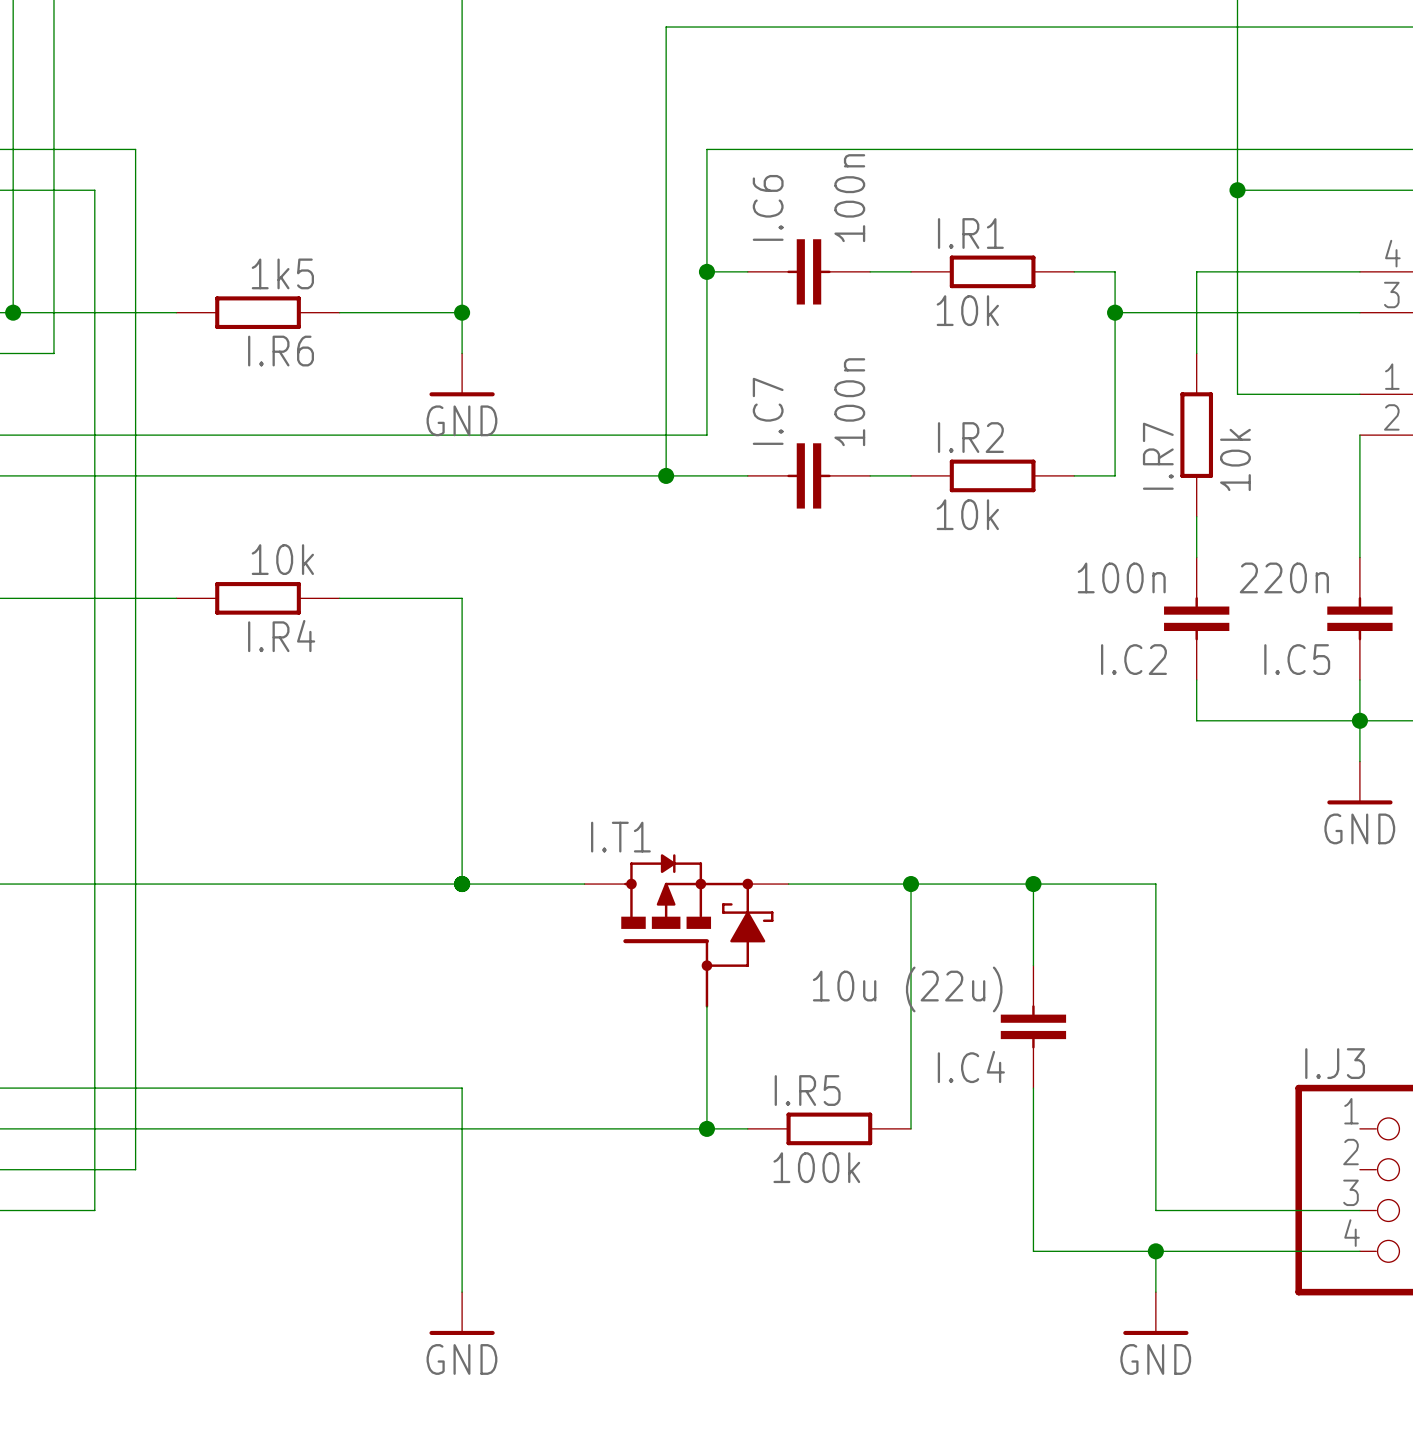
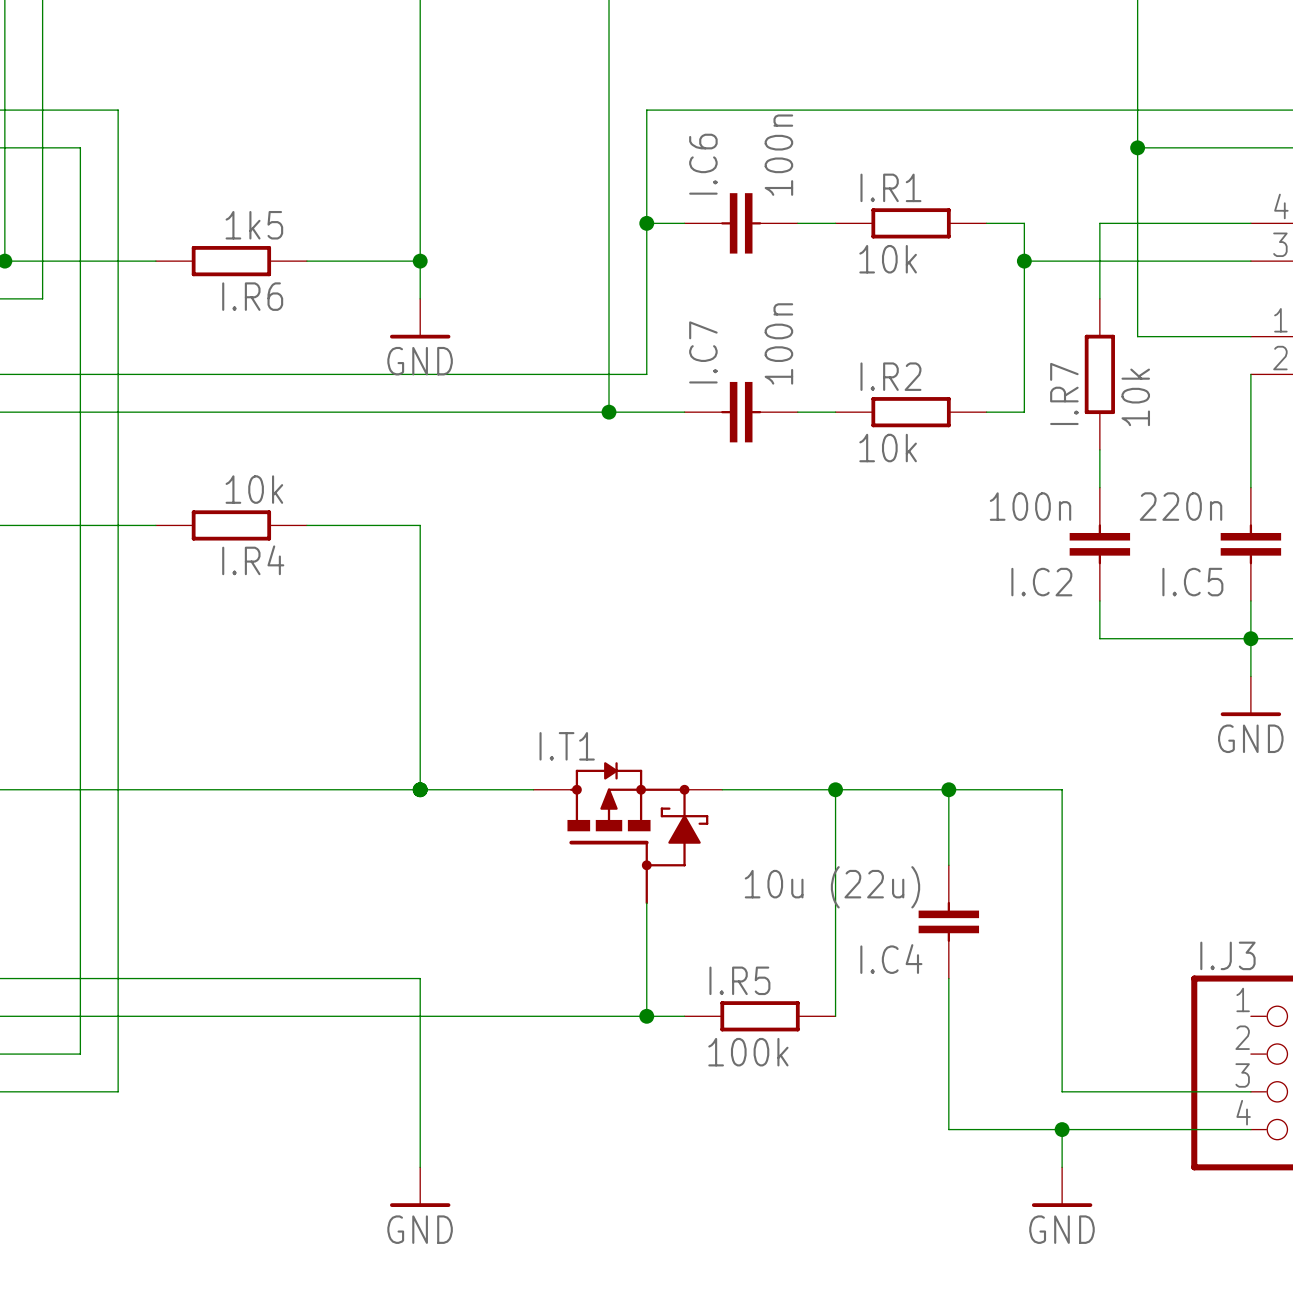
wire: (135, 1169) (94, 1169) (94, 1210) -> (118, 1054) (118, 1091) (80, 1091)

